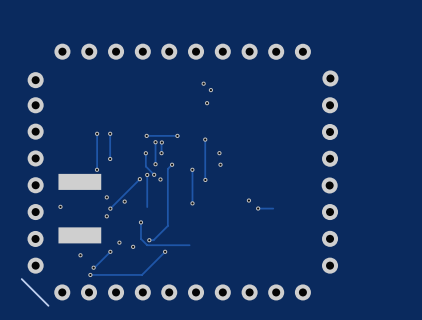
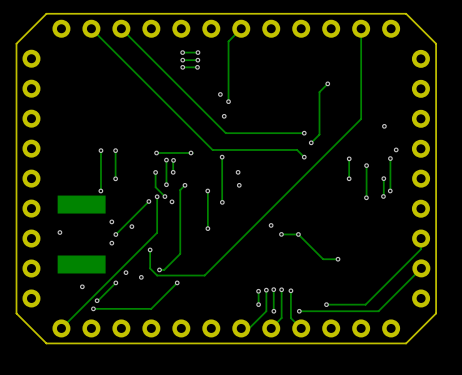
track: none -> (91, 28) (212, 149) (297, 149) (304, 157)
track: none -> (121, 28) (225, 133) (304, 133)
track: none -> (241, 28) (228, 41) (228, 101)
track: none -> (361, 28) (361, 119) (204, 275)
via: none -> (182, 52)
track: none -> (197, 52) (182, 52)
via: none -> (197, 52)
via: none -> (182, 60)
track: none -> (197, 60) (182, 60)
via: none -> (197, 60)
via: none -> (182, 67)
track: none -> (197, 67) (182, 67)
via: none -> (197, 67)
track: none -> (327, 83) (319, 92) (319, 134) (311, 142)
via: none -> (327, 83)
via: none -> (384, 126)
via: none -> (304, 133)
via: none -> (311, 142)
via: none -> (396, 149)
via: none -> (304, 157)
track: none -> (390, 158) (390, 190)
via: none -> (390, 158)
track: none -> (349, 158) (349, 178)
via: none -> (349, 158)
track: none -> (366, 165) (366, 197)
via: none -> (366, 165)
part: none -> (226, 178)
via: none -> (349, 178)
track: none -> (383, 178) (383, 196)
via: none -> (383, 178)
via: none -> (390, 190)
part: (182, 172) -> none
via: none -> (383, 196)
via: none -> (366, 197)
track: none -> (157, 232) (61, 328)
track: none -> (298, 234) (323, 259) (338, 259)
via: none -> (298, 234)
track: none -> (421, 238) (421, 249) (365, 304) (326, 304)
via: none -> (338, 259)
track: none -> (421, 268) (378, 311) (299, 311)
track: none -> (273, 289) (273, 311)
via: none -> (273, 289)
track: none -> (281, 289) (281, 318) (271, 328)
via: none -> (281, 289)
track: none -> (266, 290) (266, 311) (249, 328) (241, 328)
via: none -> (266, 290)
track: none -> (290, 290) (290, 318) (301, 328)
via: none -> (290, 290)
track: none -> (258, 291) (258, 304)
via: none -> (258, 291)
via: none -> (258, 304)
via: none -> (326, 304)
via: none -> (273, 311)
via: none -> (299, 311)
board edge: none -> (16, 313) (16, 43) (46, 13) (406, 13) (436, 43) (436, 313) (406, 343) (46, 343)

